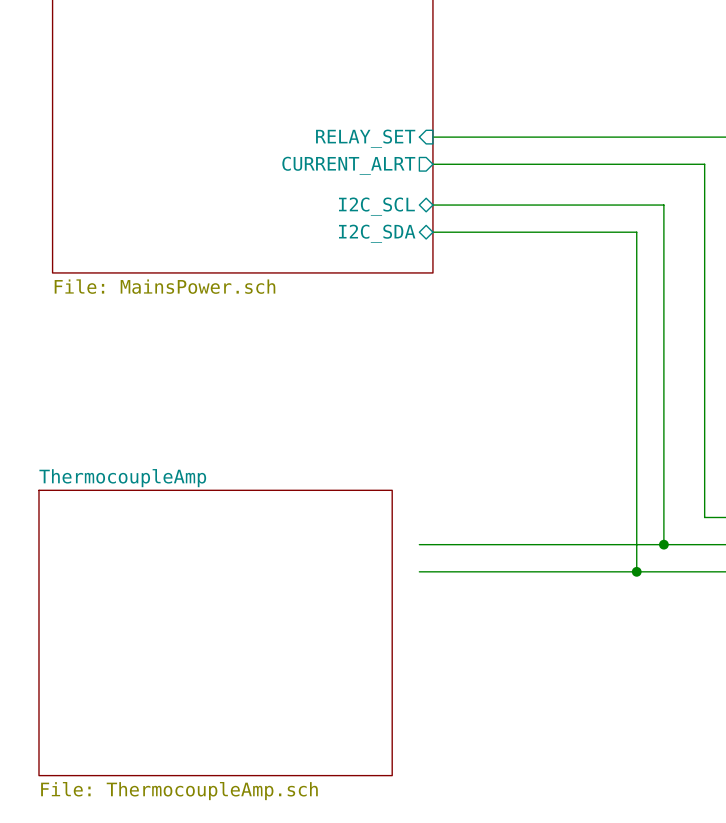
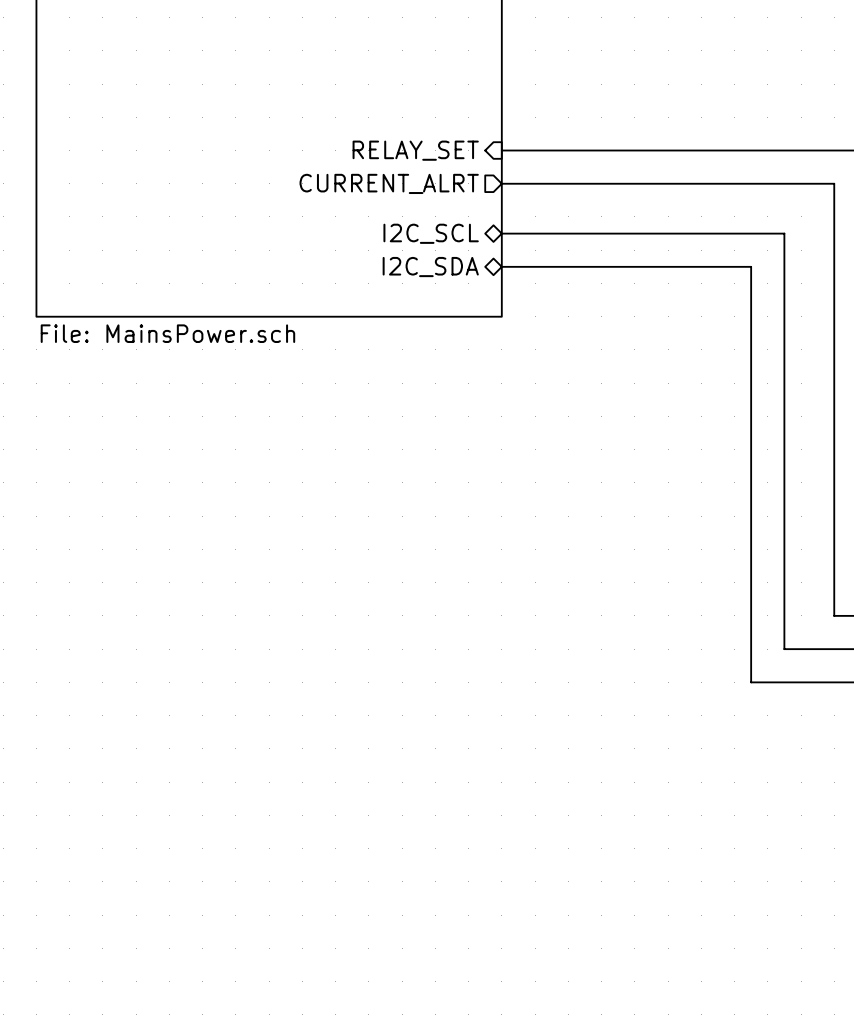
wire: (419, 544) (663, 544) -> none
junction: (663, 544) -> none
wire: (419, 571) (636, 571) -> none
junction: (636, 571) -> none
sheet ThermocoupleAmp: File: ThermocoupleAmp.sch (215, 632) -> none

